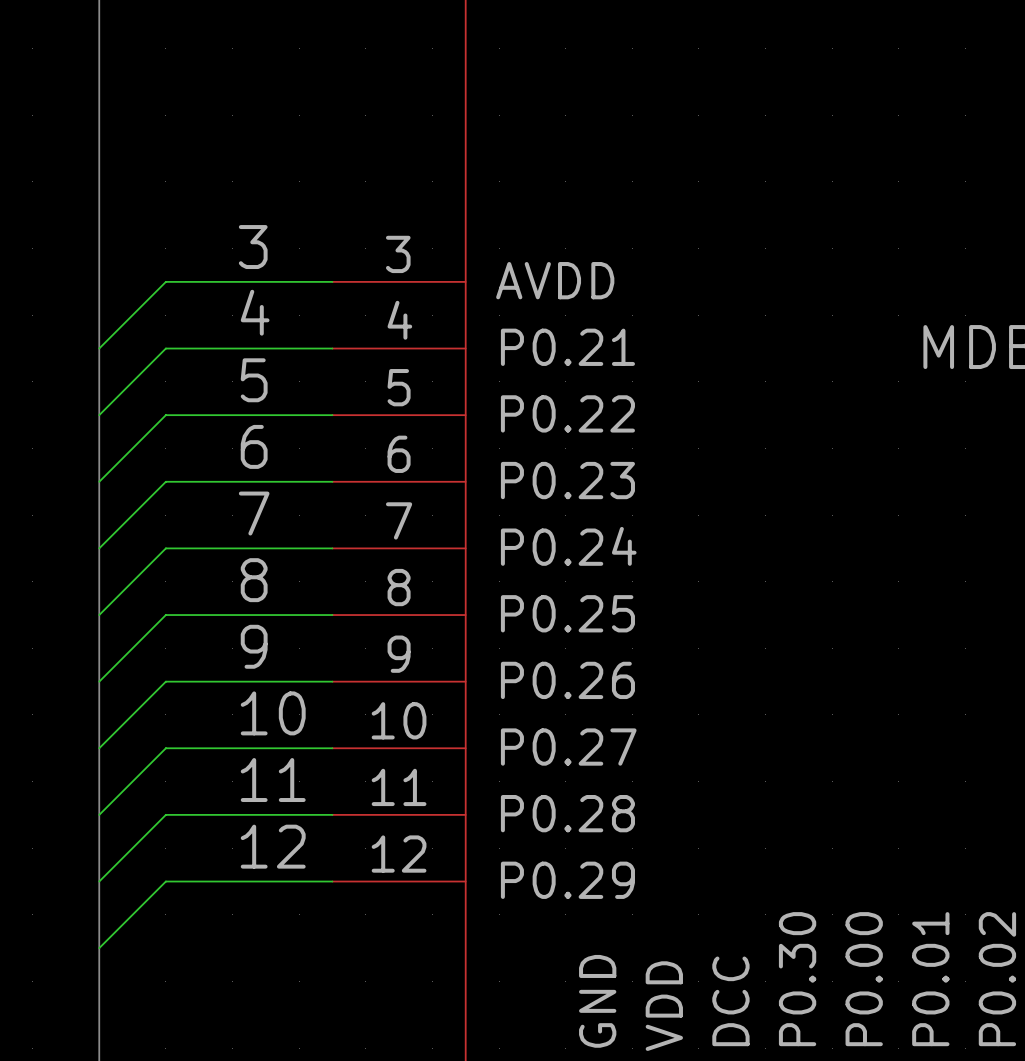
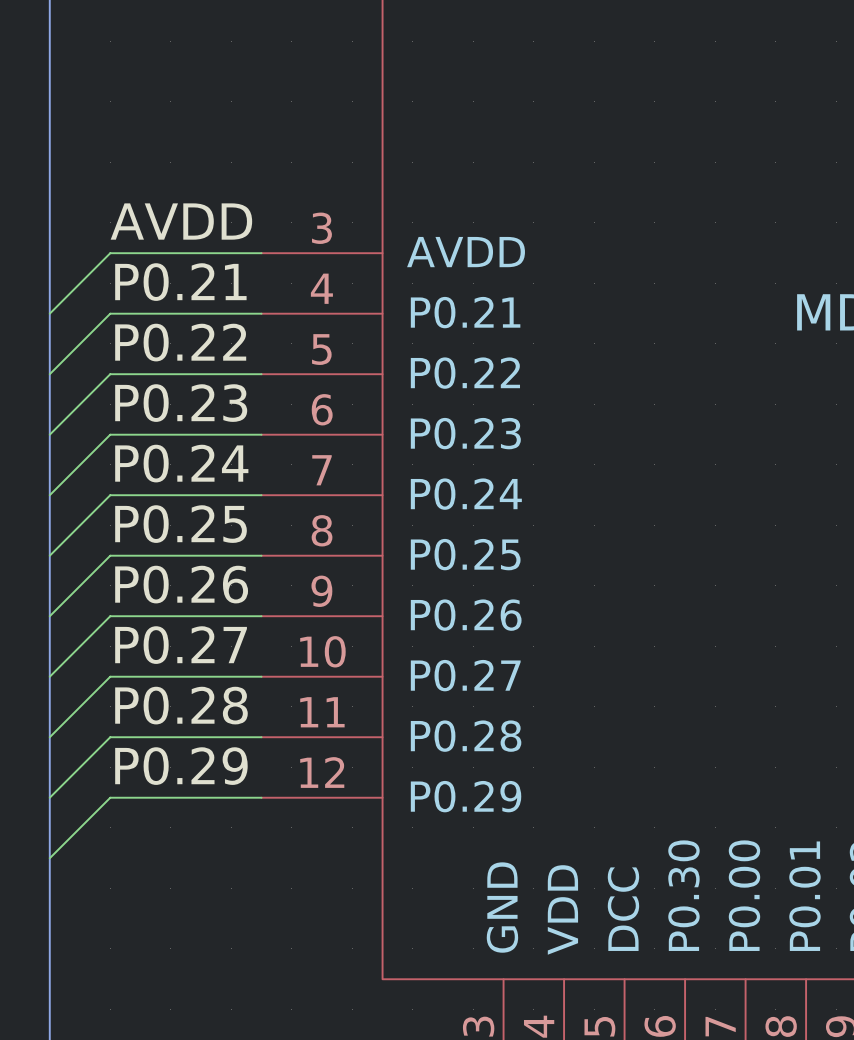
label: none -> AVDD (181, 221)
label: 3 (253, 247) -> none
label: 4 (255, 312) -> none
label: none -> P0.21 (180, 282)
label: 5 (254, 380) -> none
label: none -> P0.22 (180, 342)
label: 6 (254, 446) -> none
label: none -> P0.23 (181, 403)
label: none -> P0.24 (181, 463)
label: 7 (254, 513) -> none
label: 8 (254, 580) -> none
label: none -> P0.25 (181, 524)
label: 9 (254, 646) -> none
label: none -> P0.26 (181, 584)
label: none -> P0.27 (181, 645)
label: 10 (273, 713) -> none
label: none -> P0.28 (181, 705)
label: 11 (273, 780) -> none
label: none -> P0.29 (181, 766)
label: 12 (273, 846) -> none

